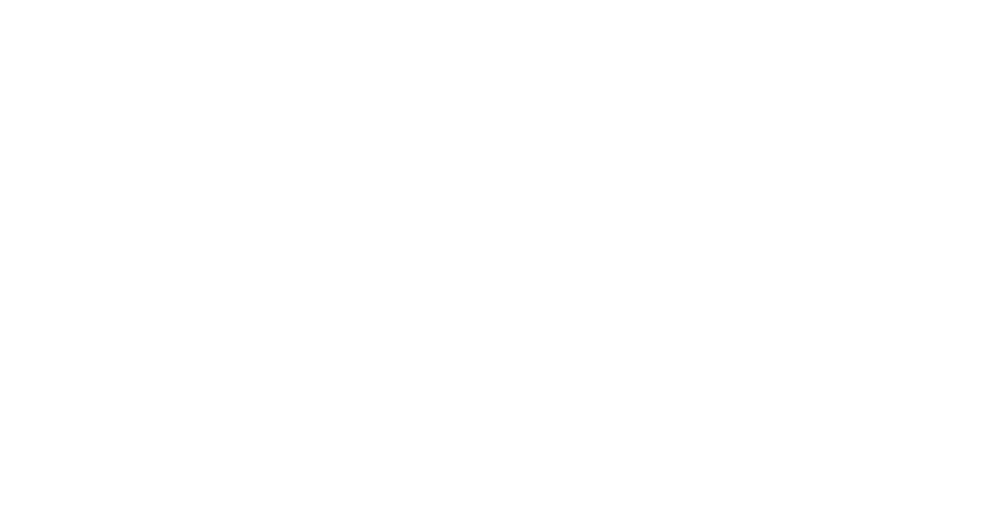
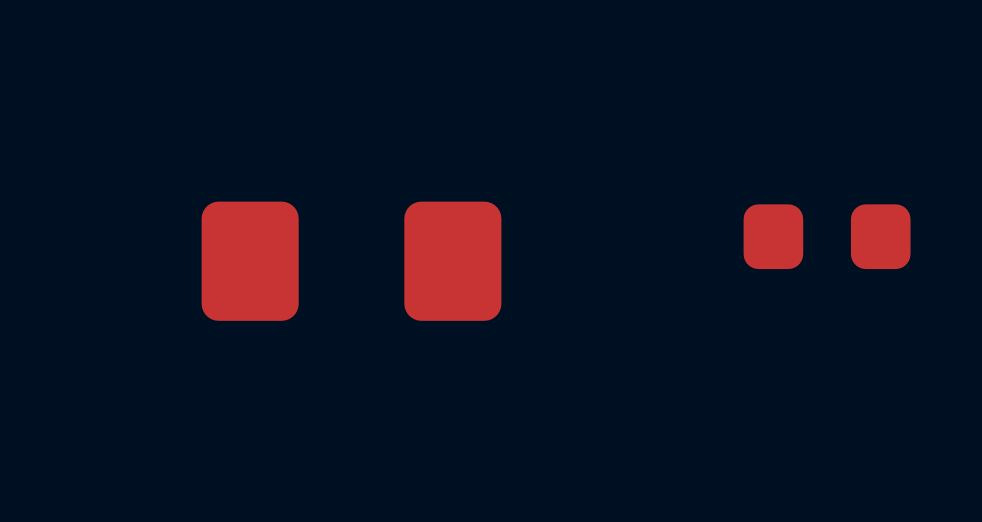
part: none -> (827, 236)
part: none -> (351, 261)

